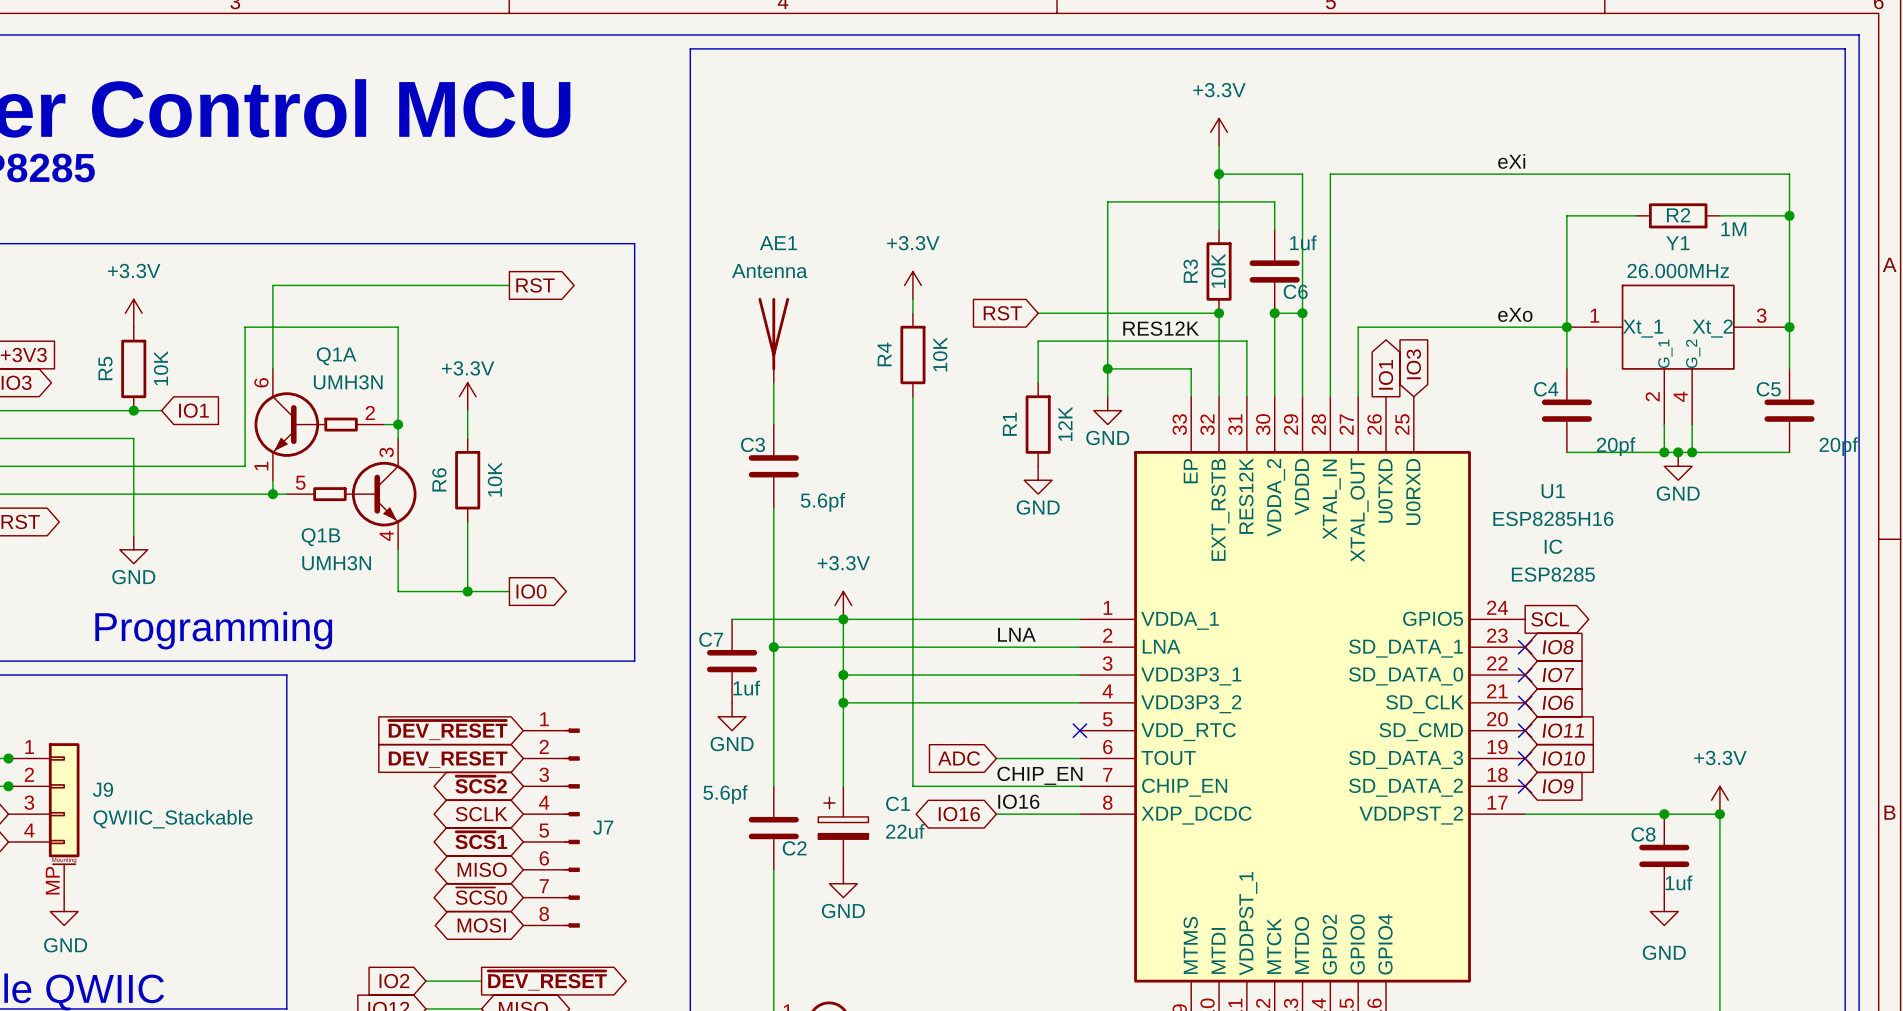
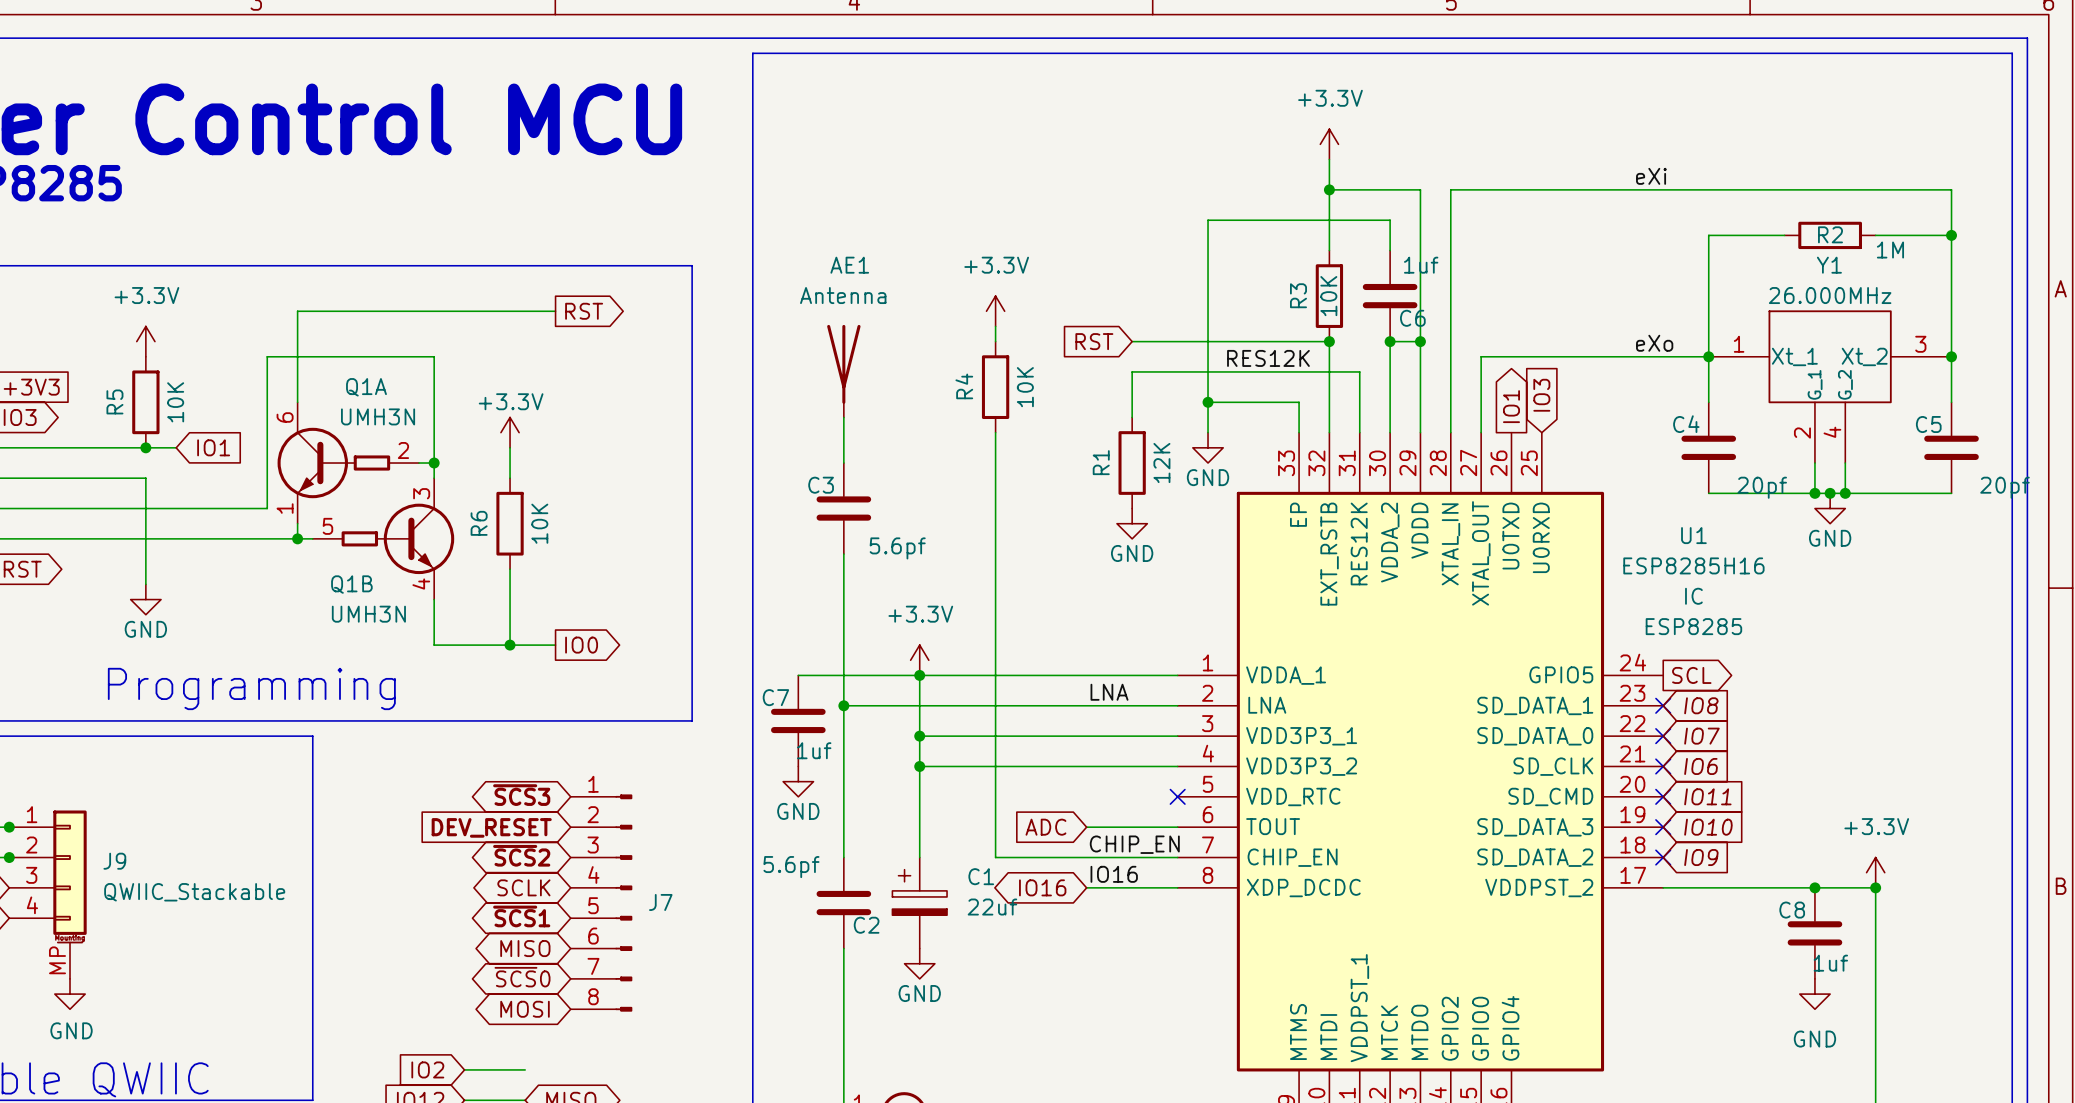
global label shape: input (448, 730) -> bidirectional (521, 795)
global label: ~{DEV_RESET} (448, 730) -> ~{SCS}3 (521, 795)
global label: ~{DEV_RESET} (547, 980) -> none

